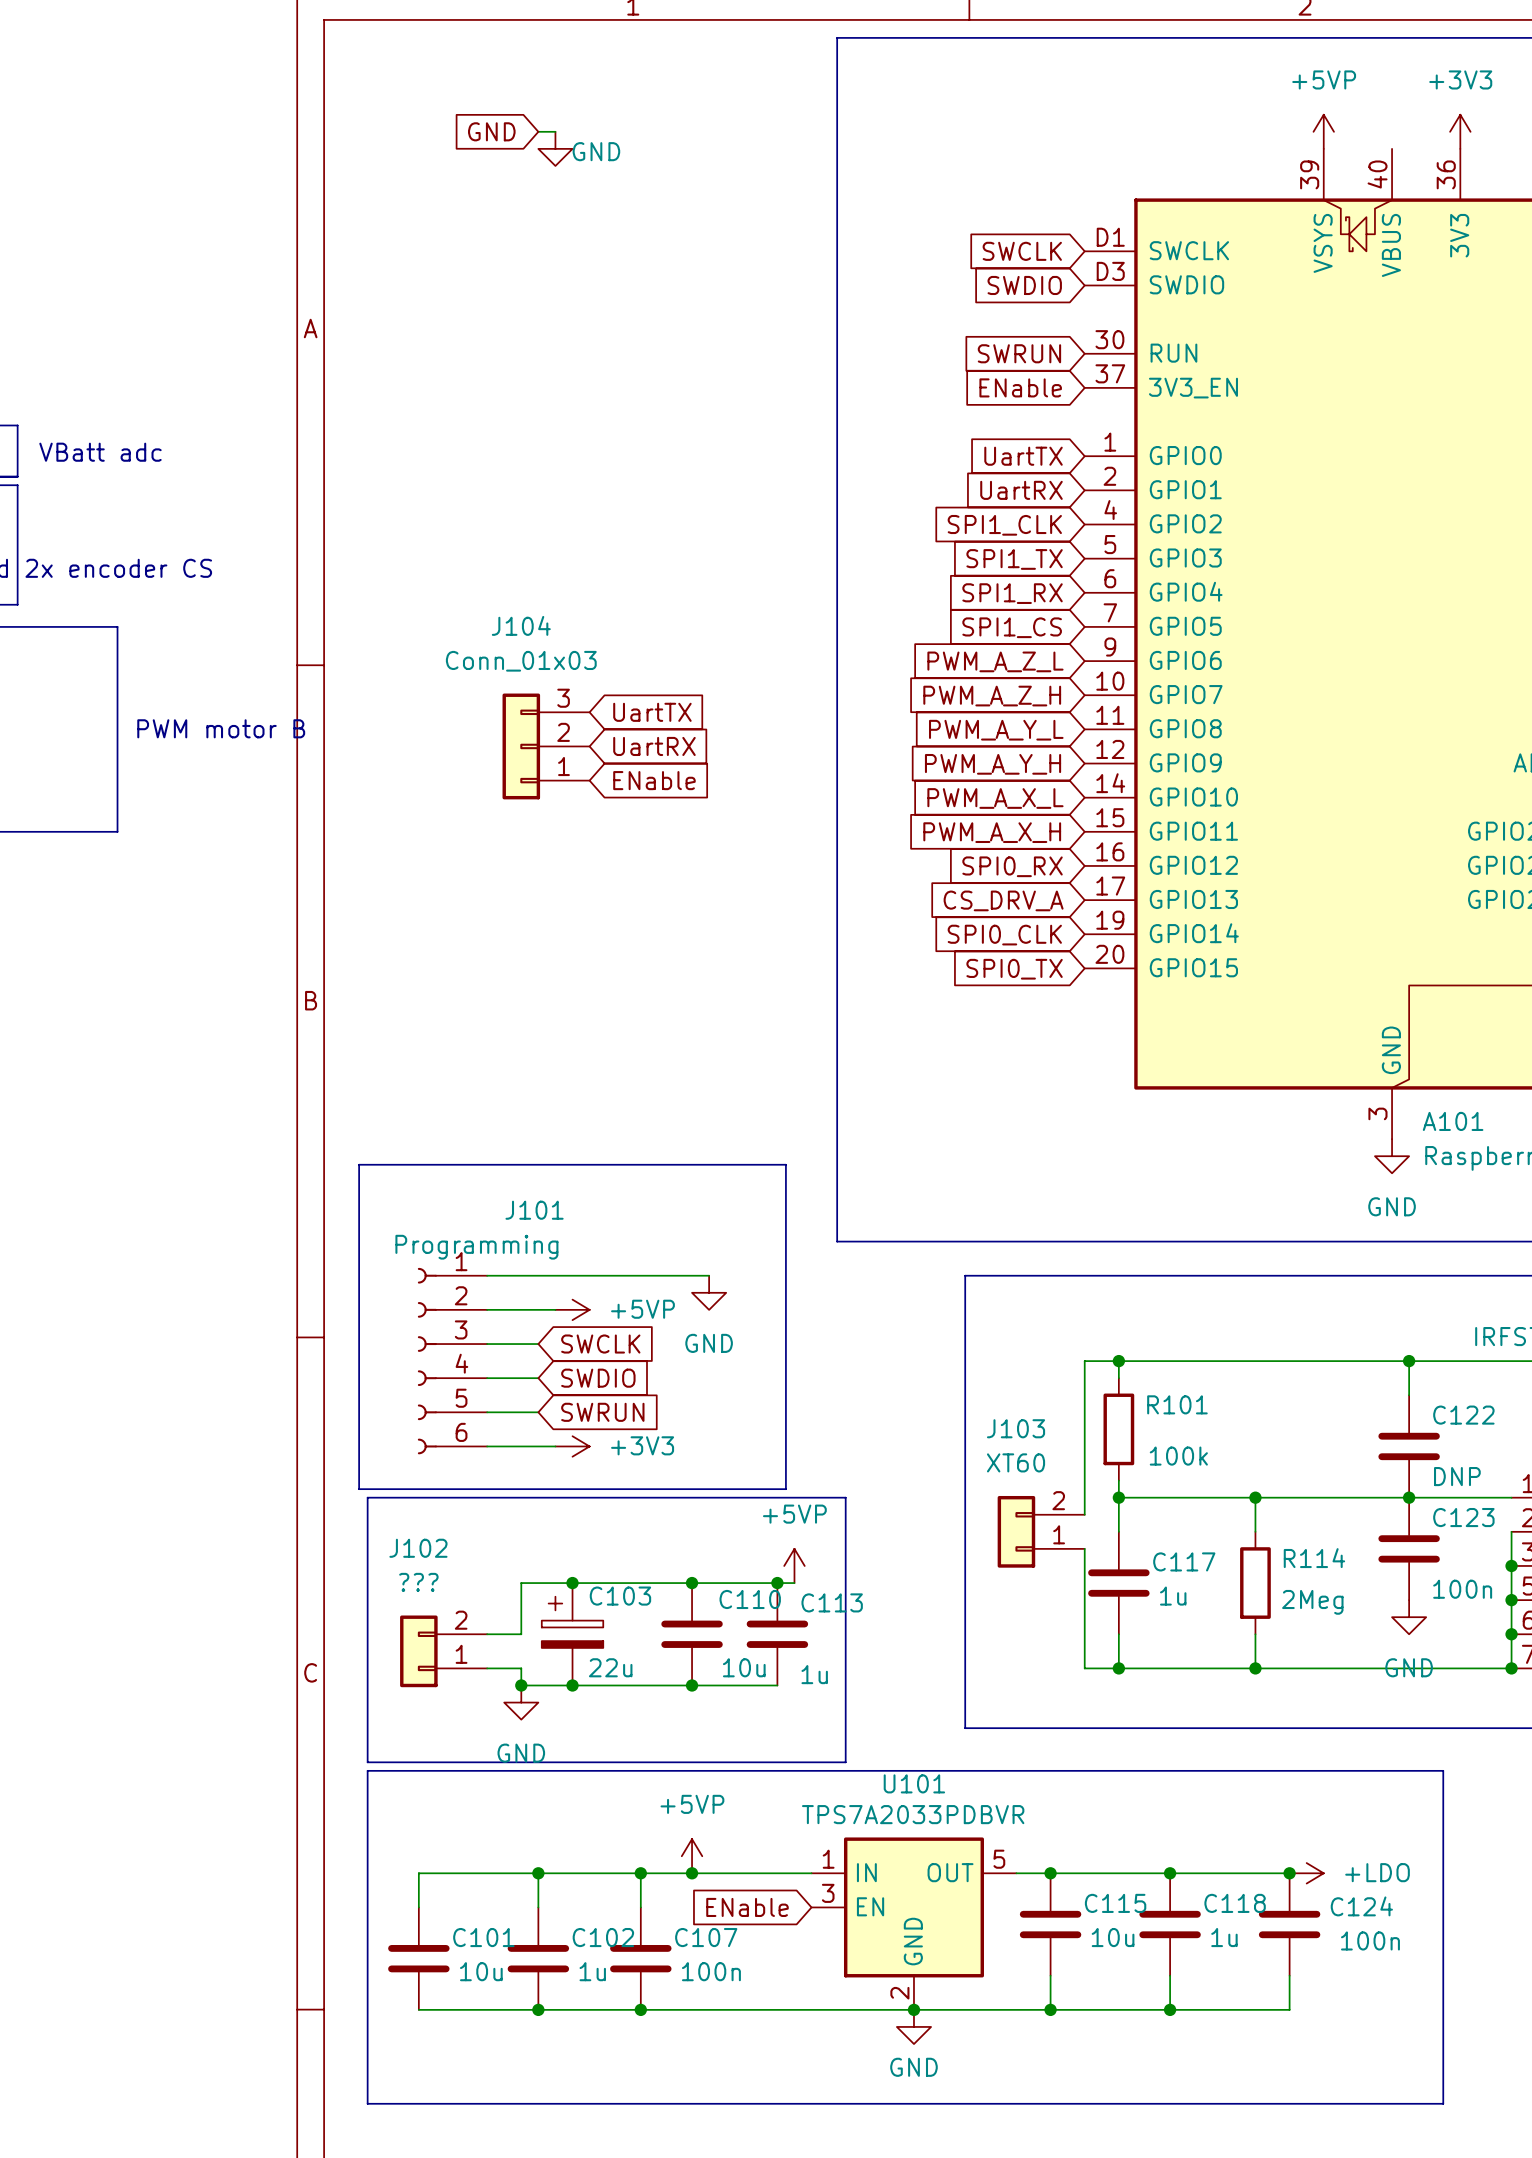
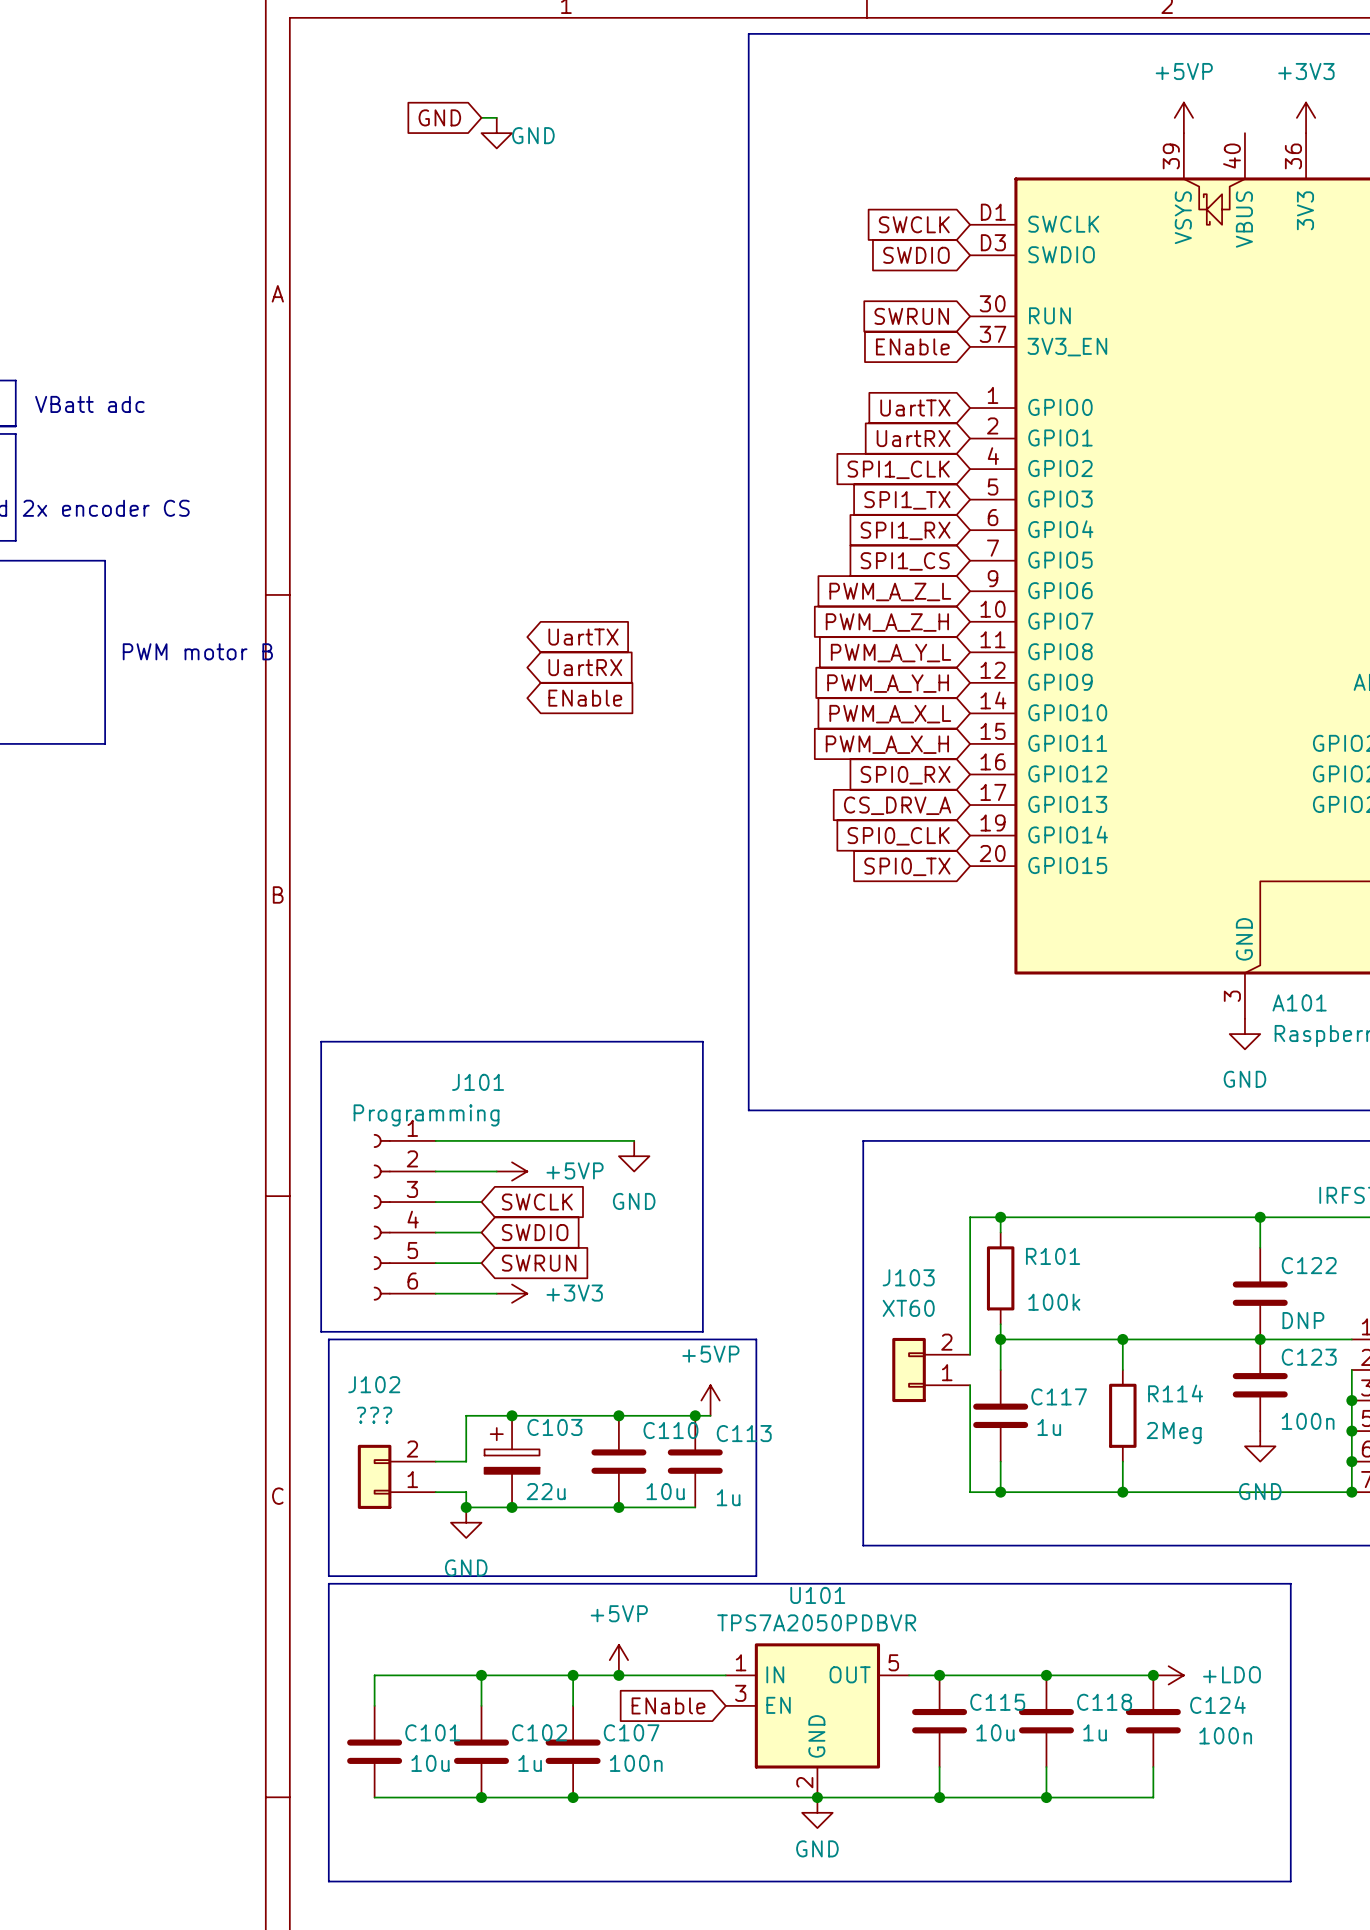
J104: Conn_01x03 (546, 746) -> none
U101 value: TPS7A2033PDBVR (913, 1814) -> TPS7A2050PDBVR (816, 1622)

